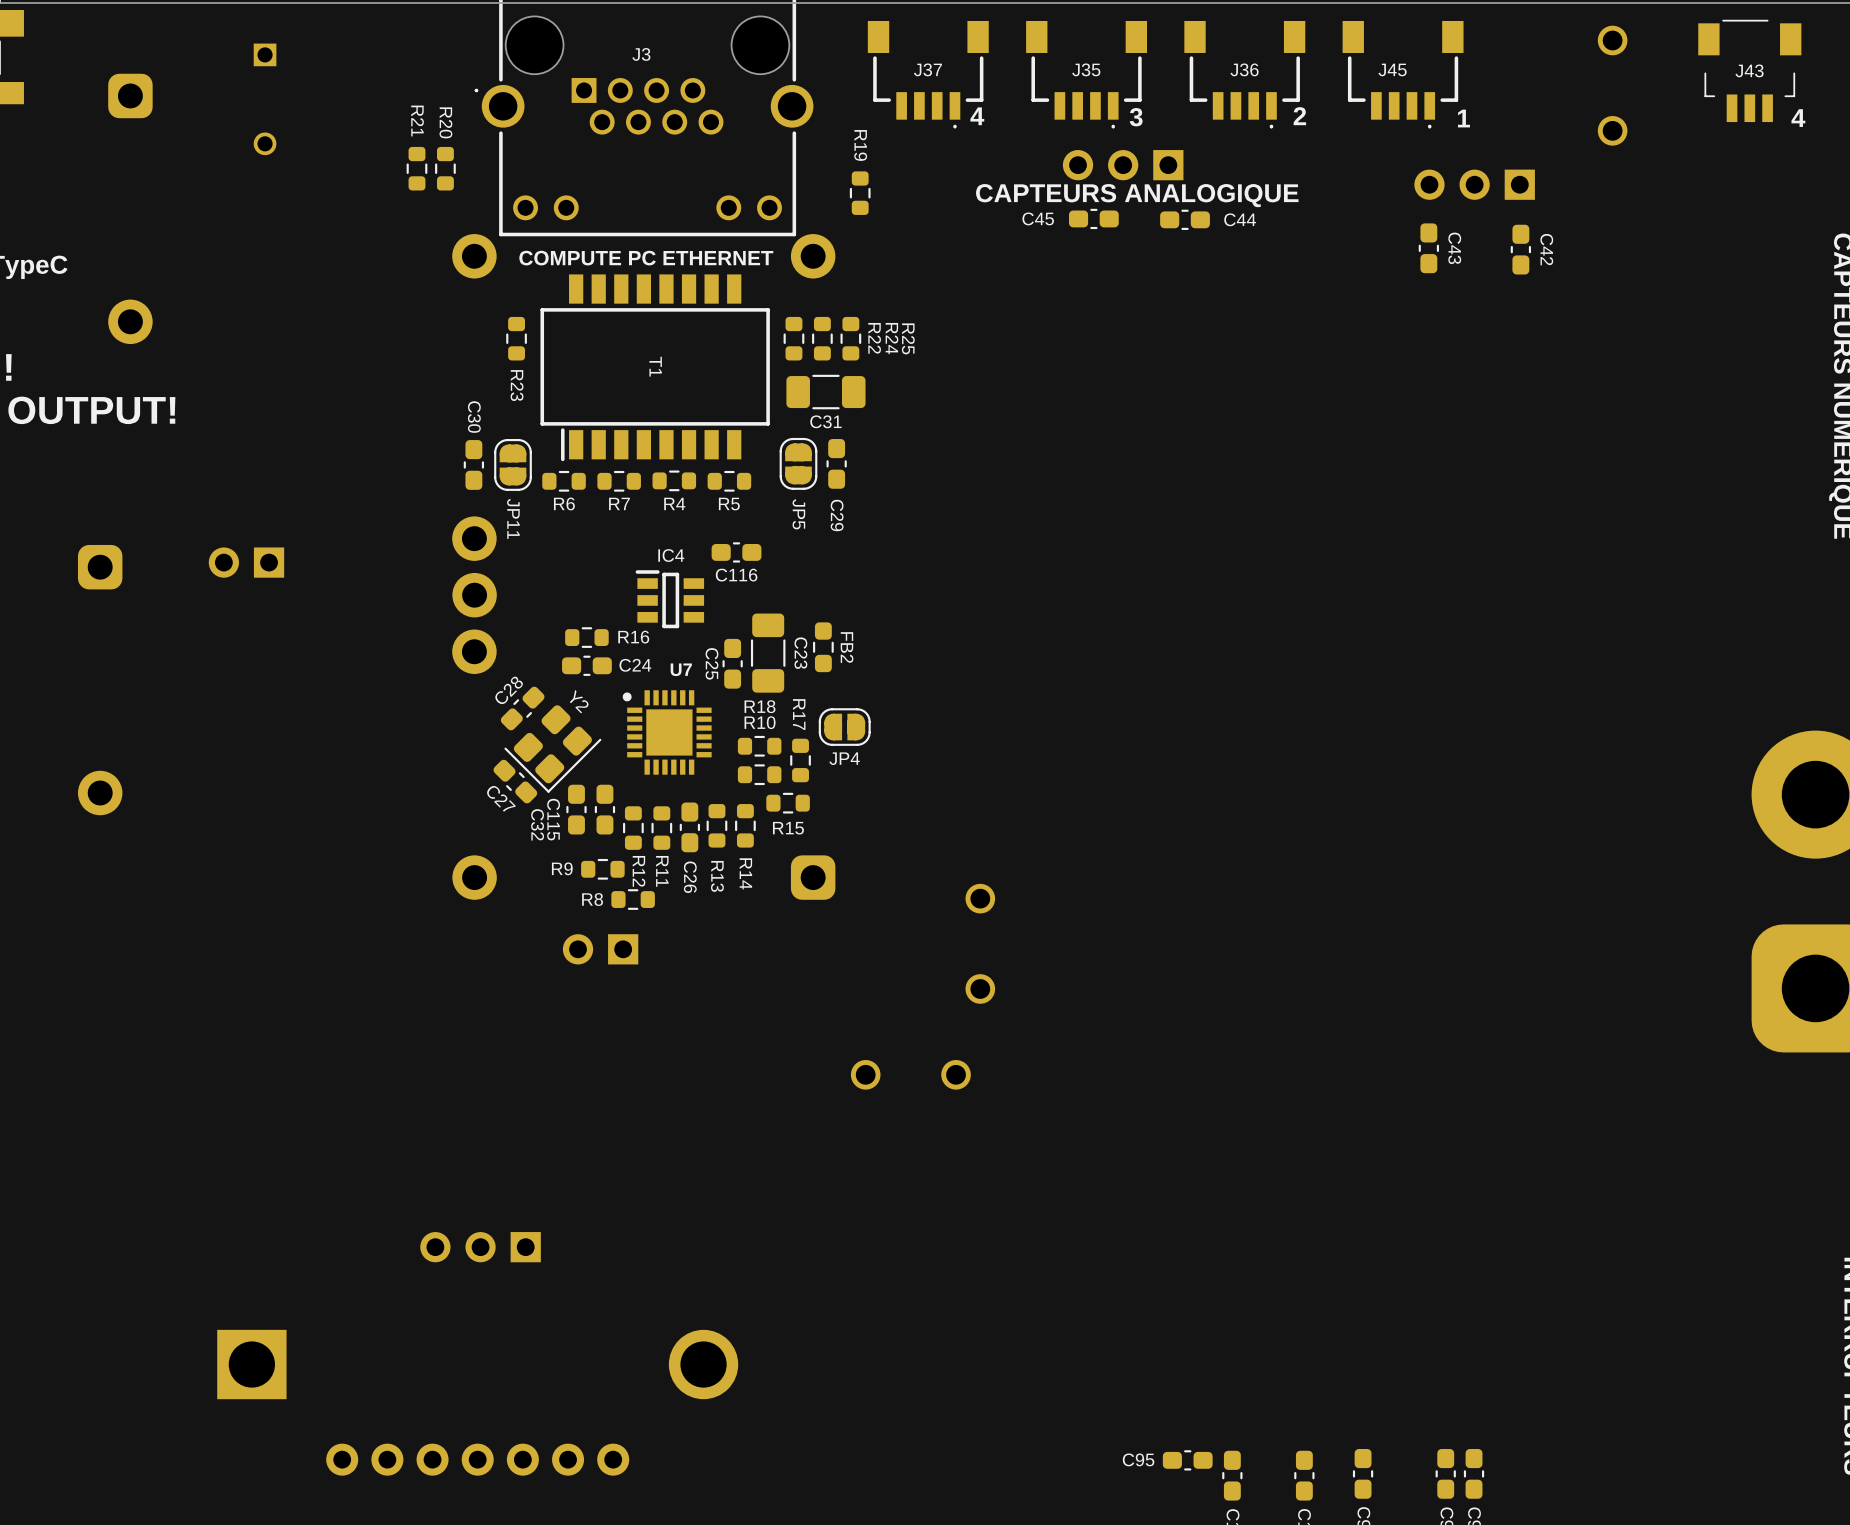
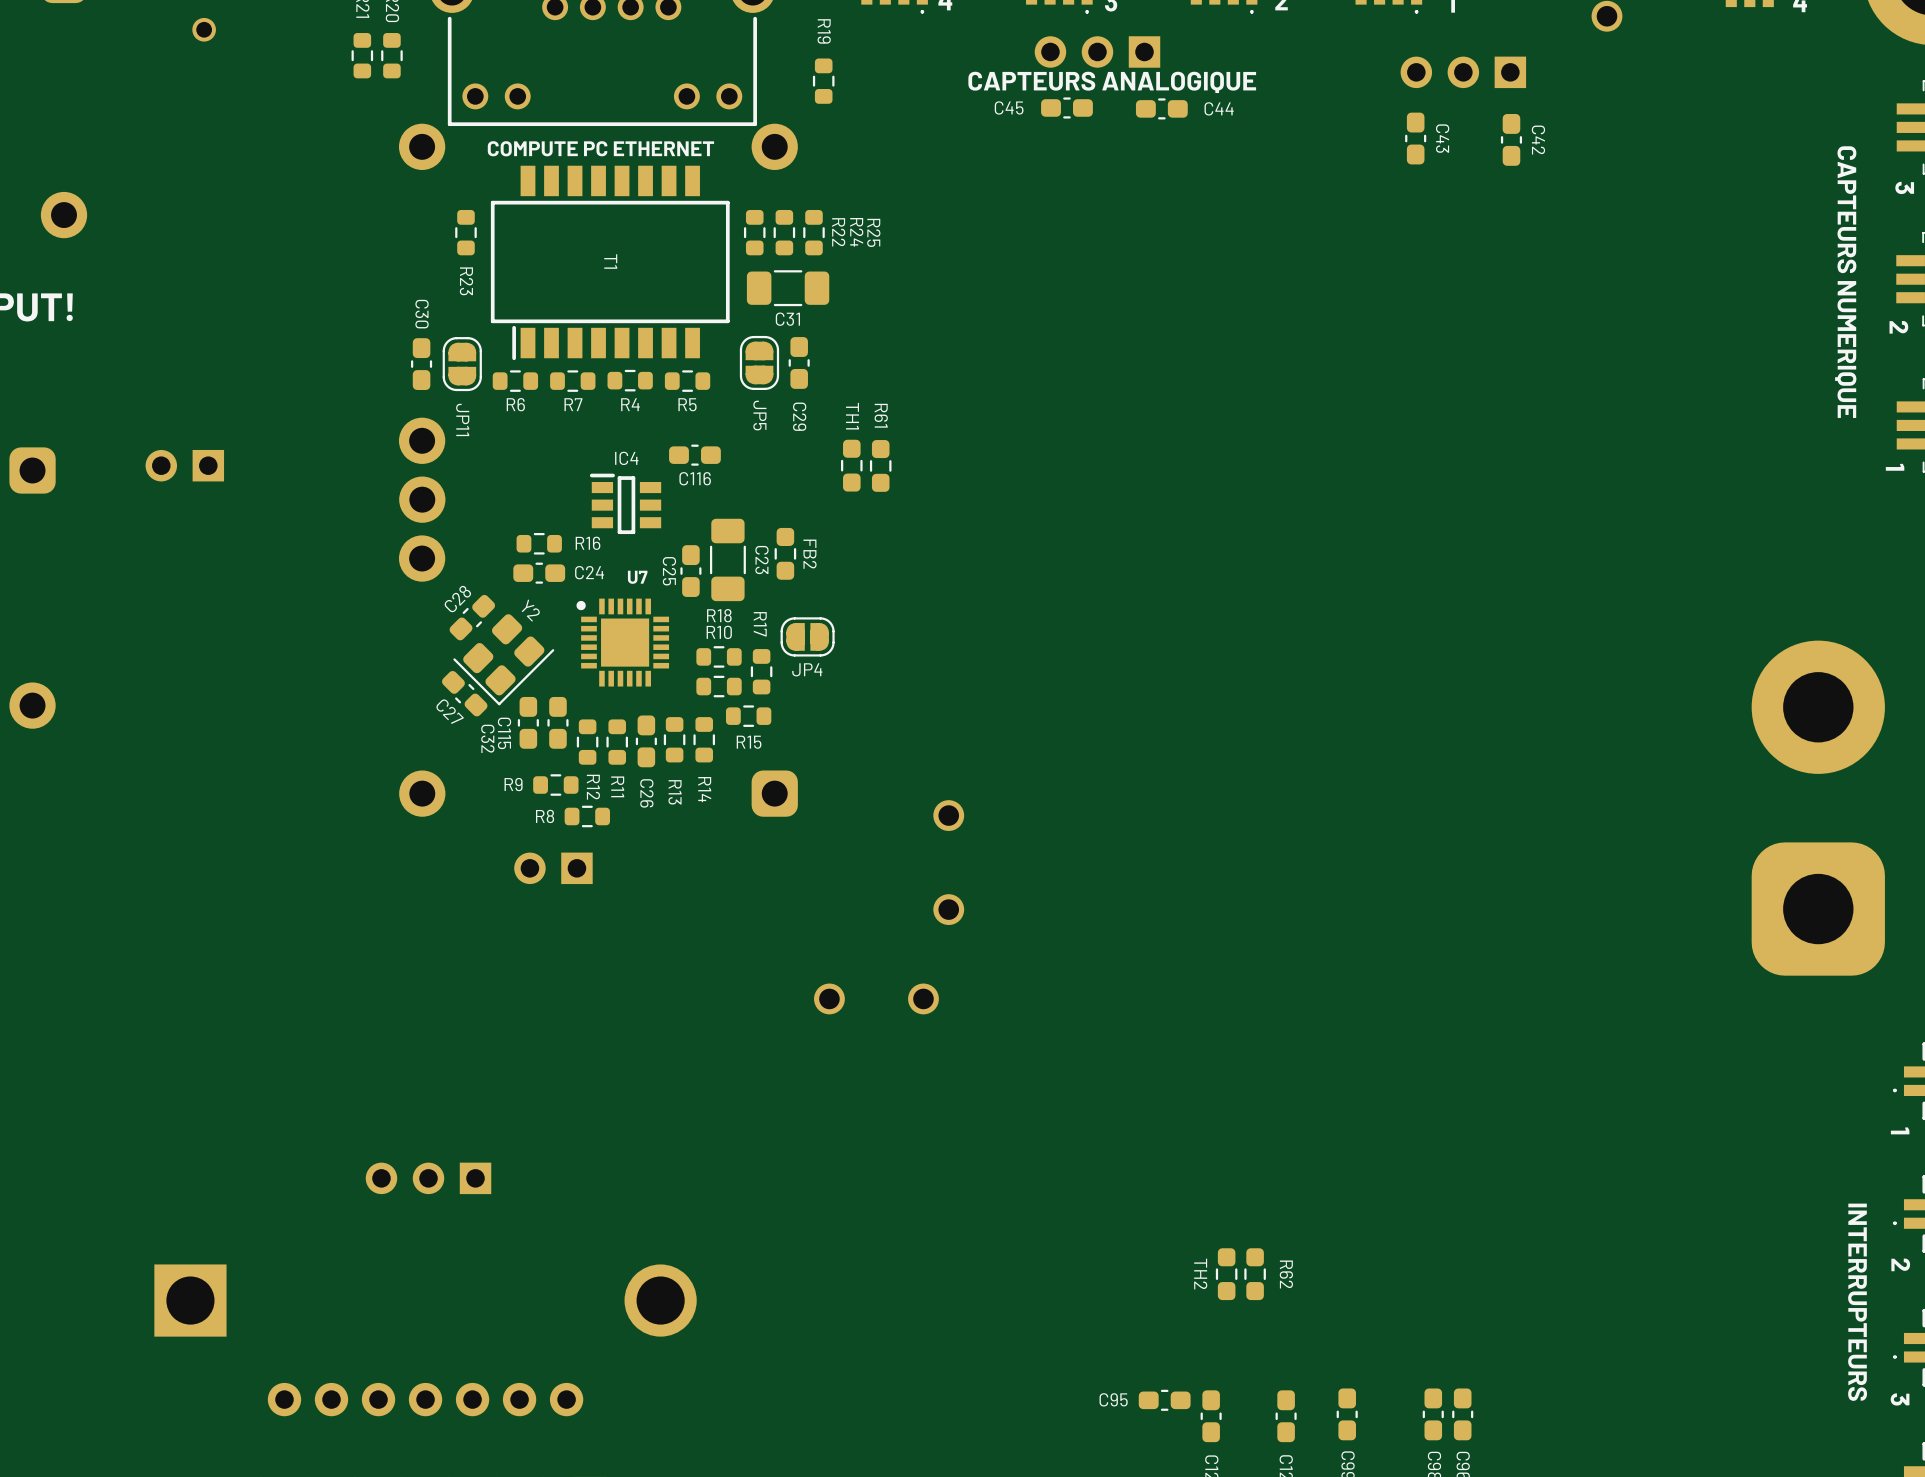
TH1: none -> (851, 465)
R61: none -> (880, 465)
TH2: none -> (1226, 1274)
R62: none -> (1255, 1274)

